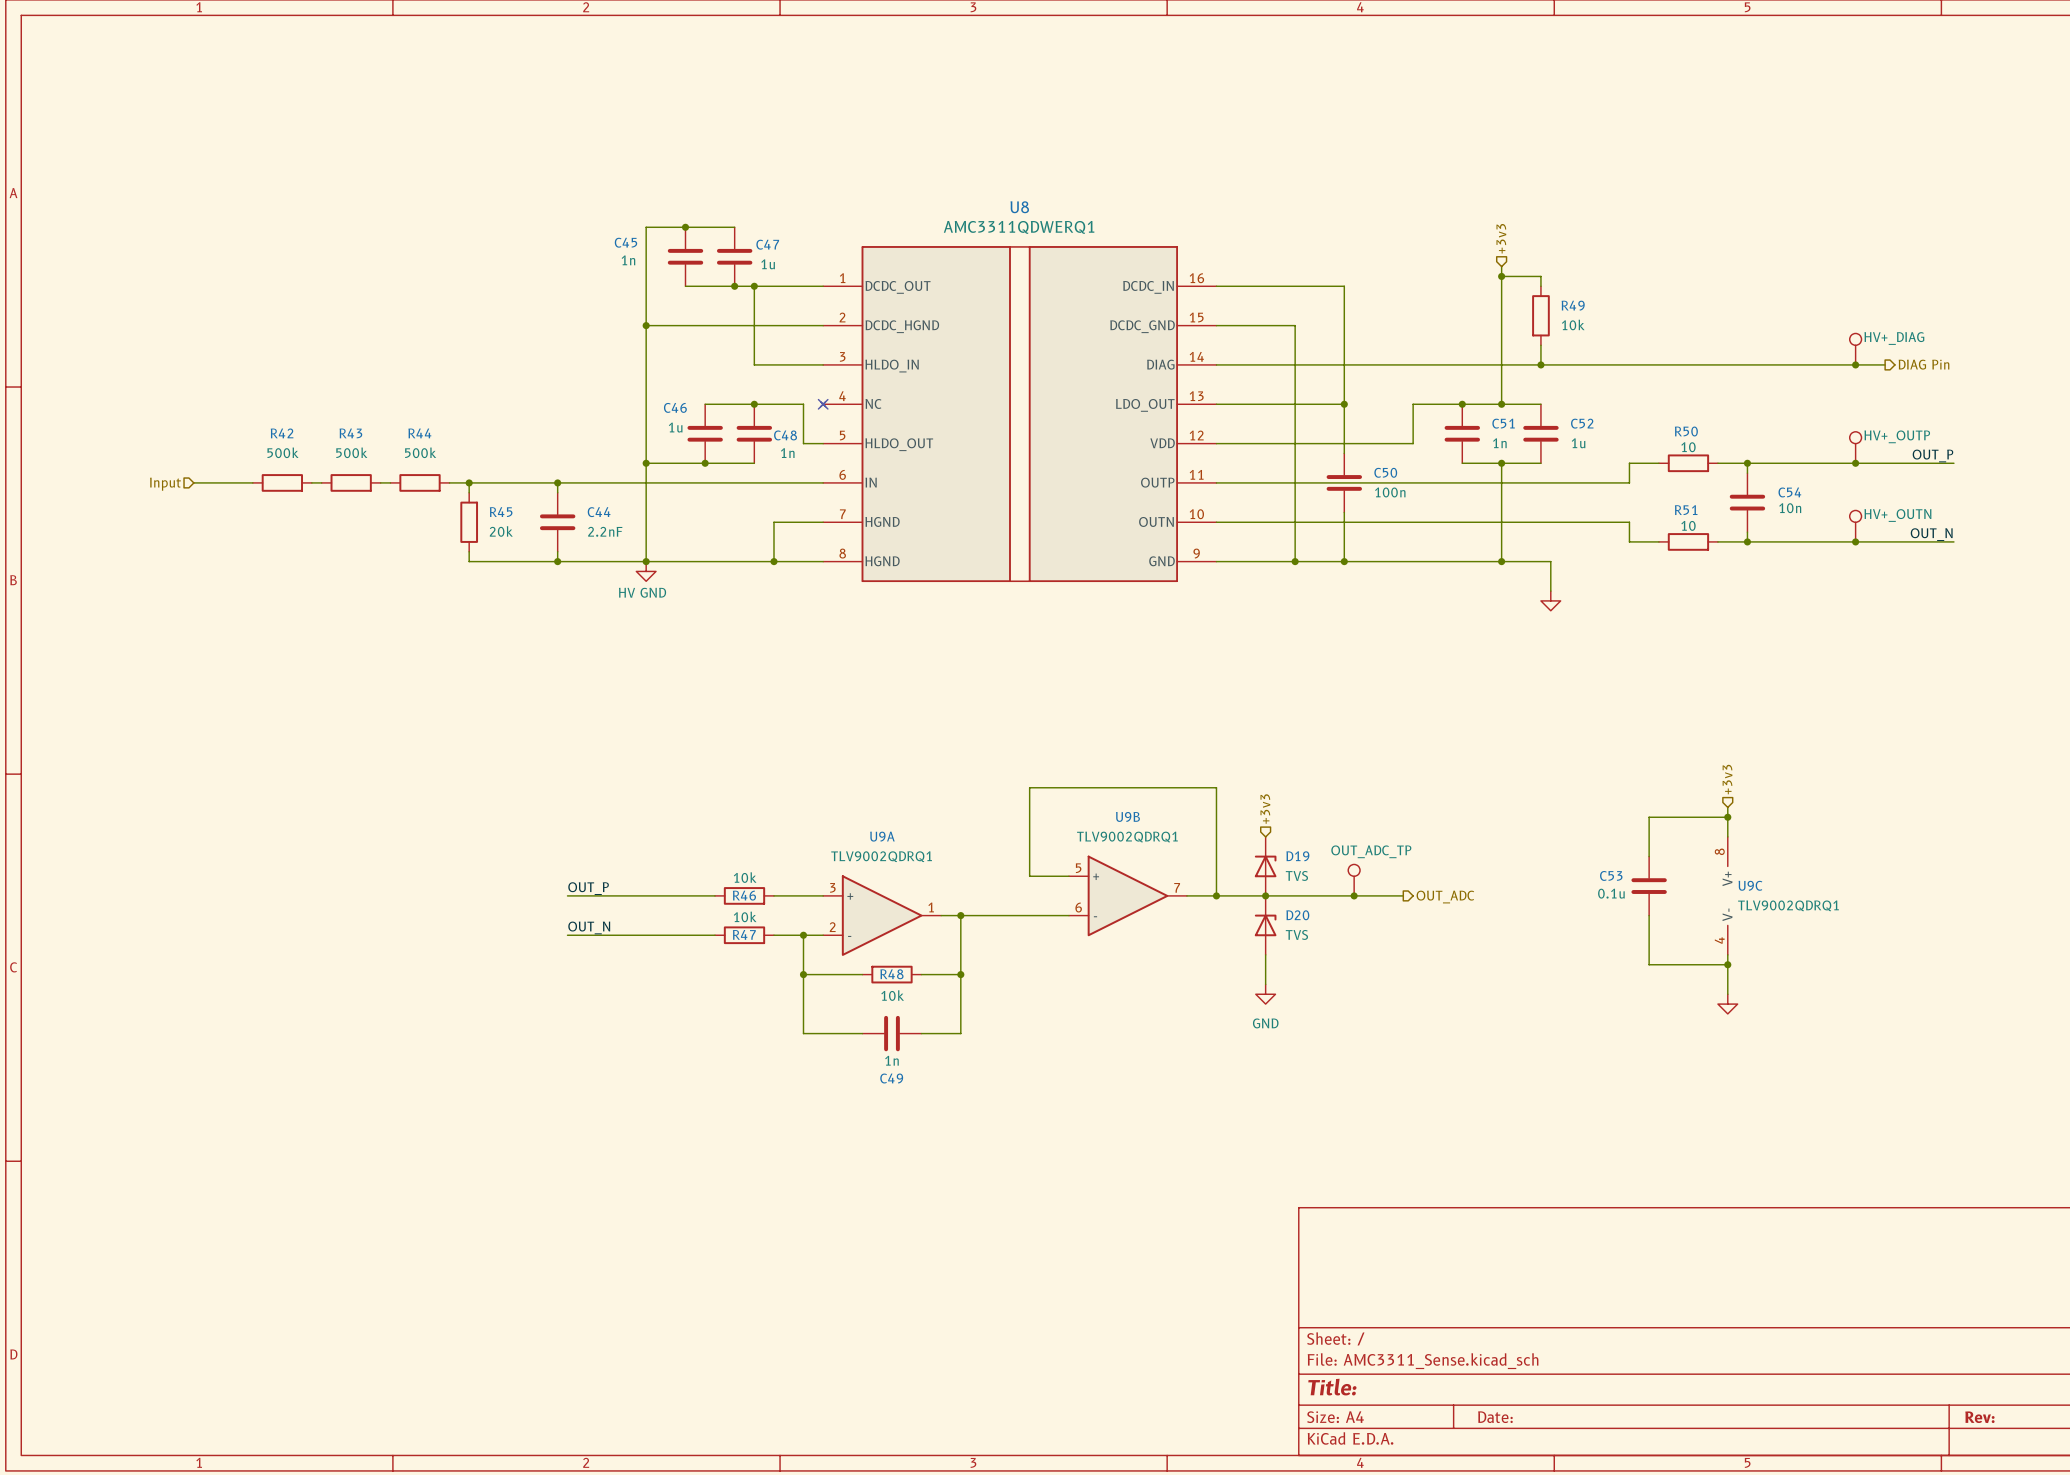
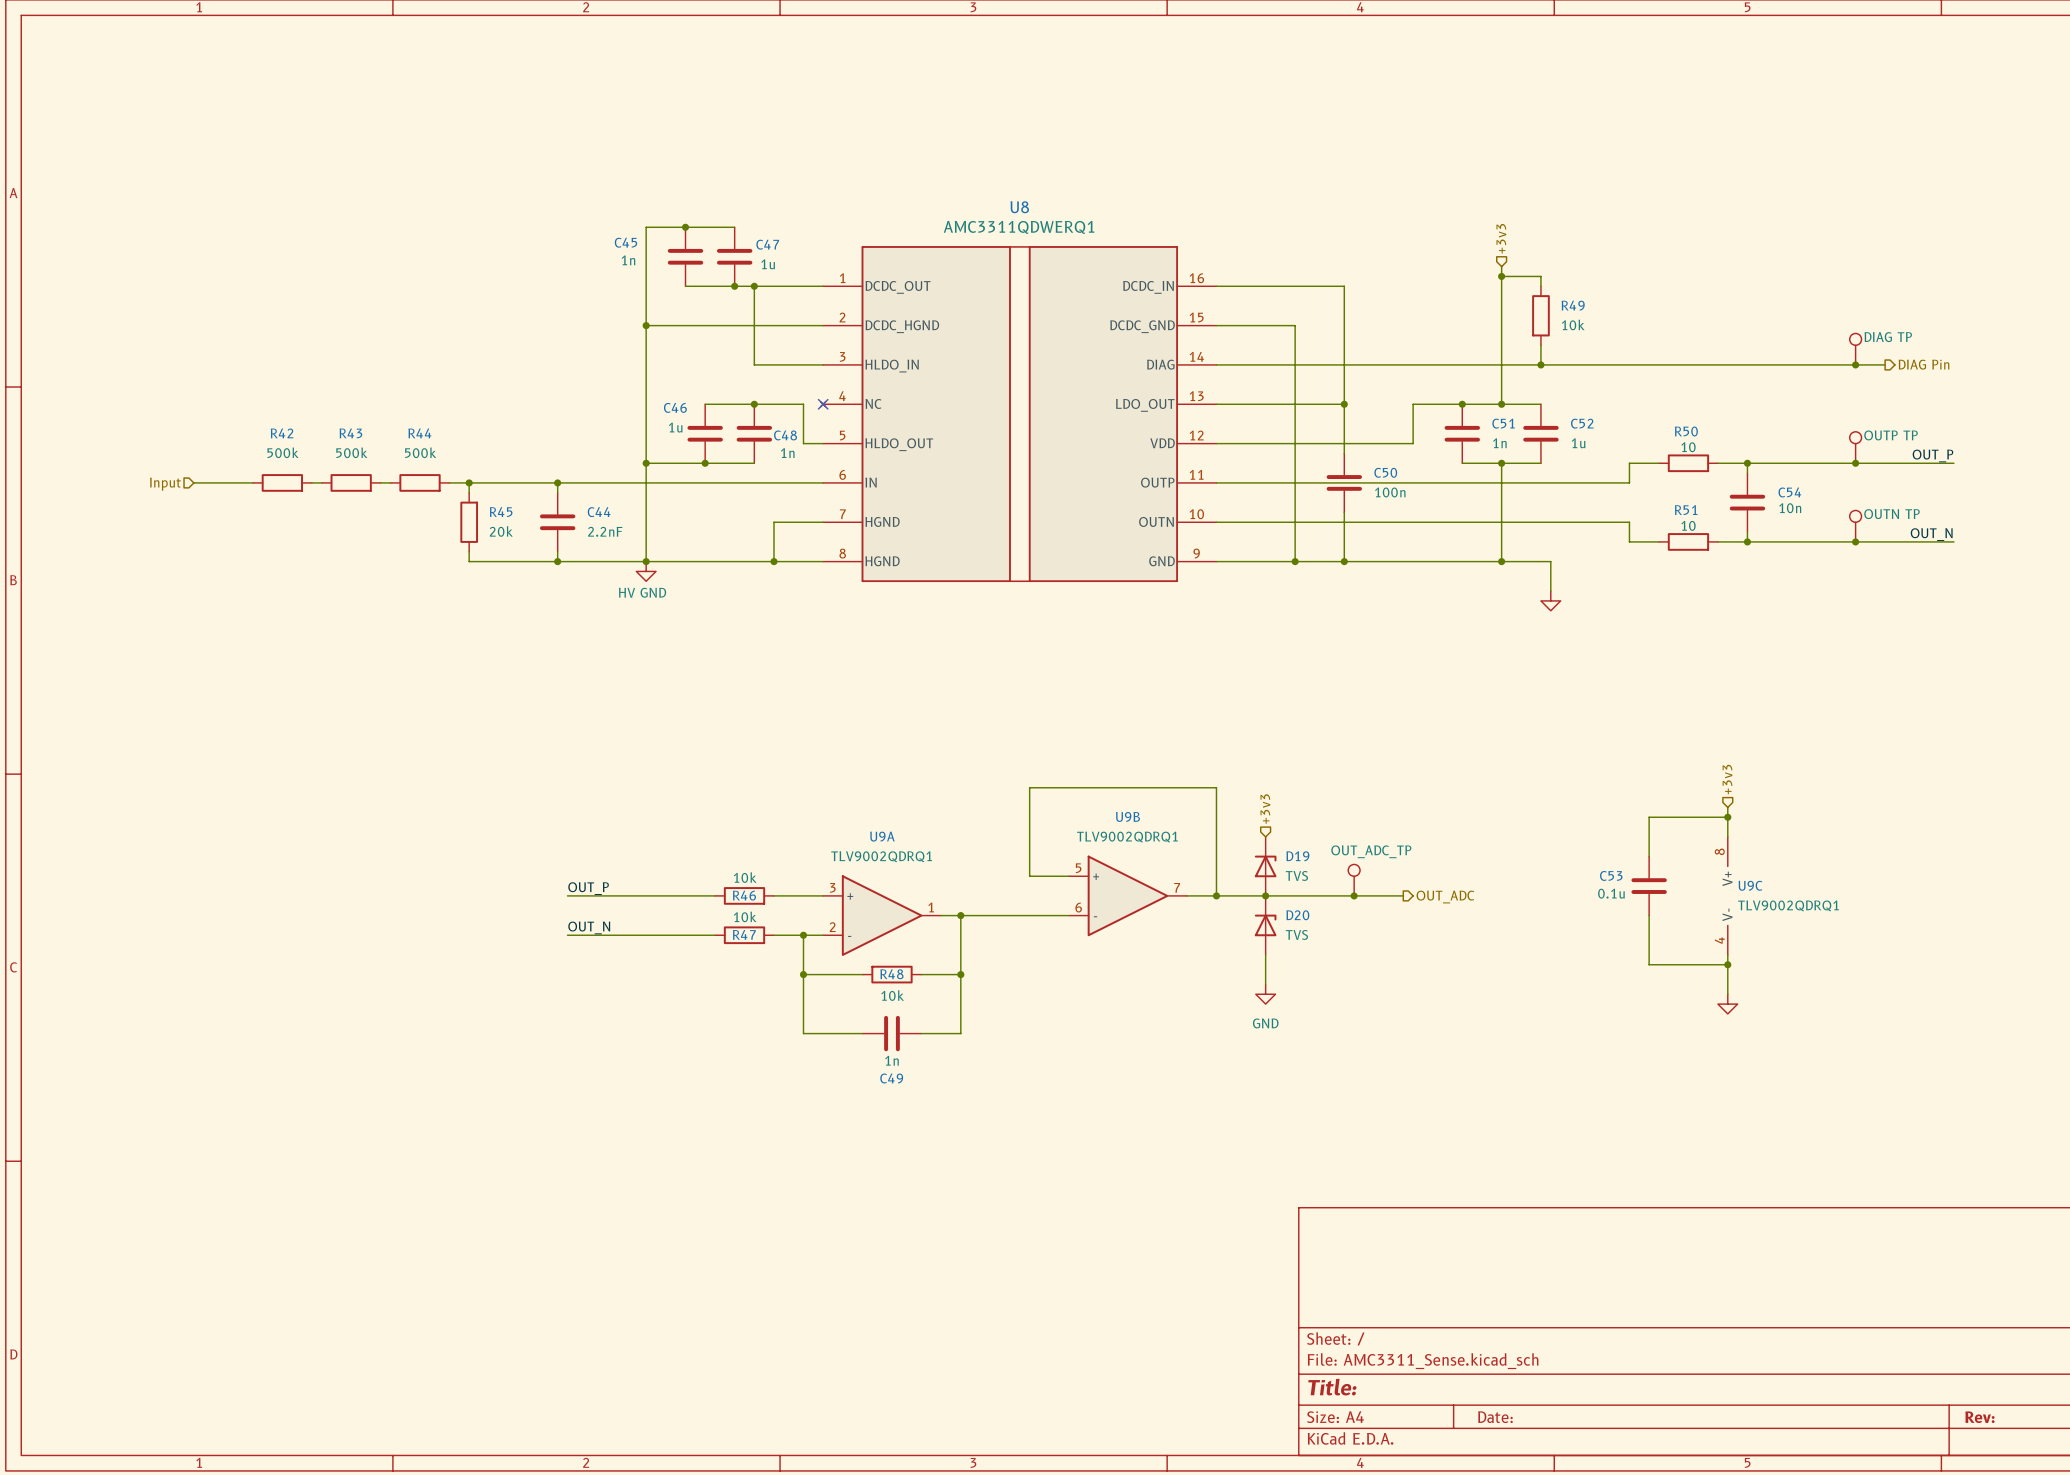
part value: HV+_DIAG (1894, 338) -> DIAG TP (1888, 337)
part value: HV+_OUTP (1897, 436) -> OUTP TP (1891, 435)
part value: HV+_OUTN (1897, 515) -> OUTN TP (1891, 514)

